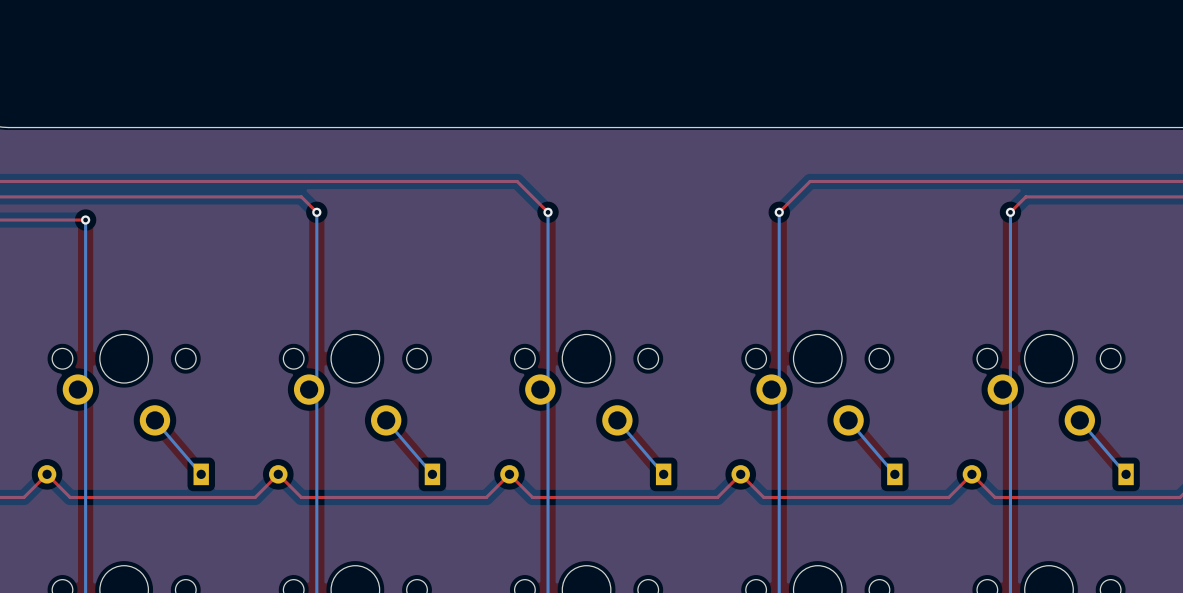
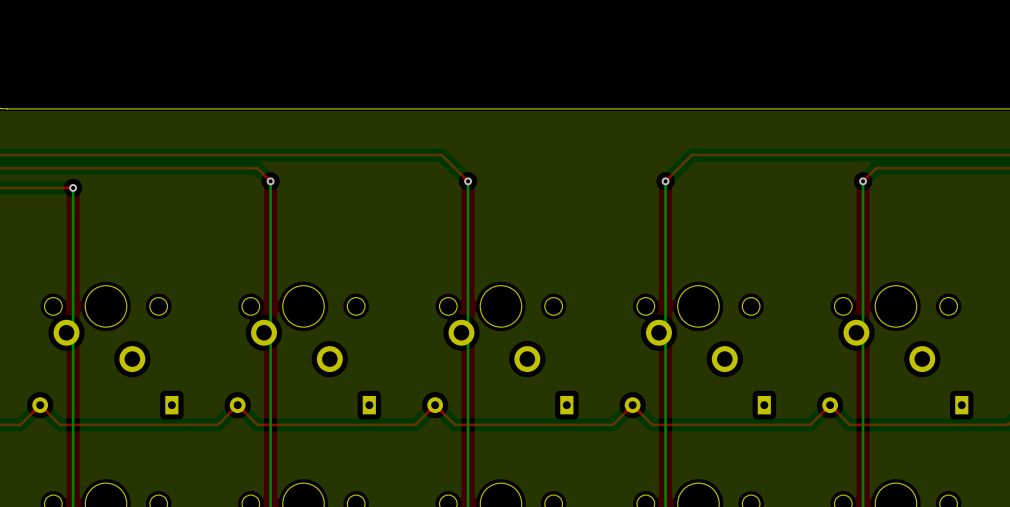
bottom track: (154, 420) (201, 474) -> none
bottom track: (386, 420) (432, 474) -> none
bottom track: (617, 420) (663, 474) -> none
bottom track: (848, 420) (894, 474) -> none
bottom track: (1079, 420) (1126, 474) -> none

